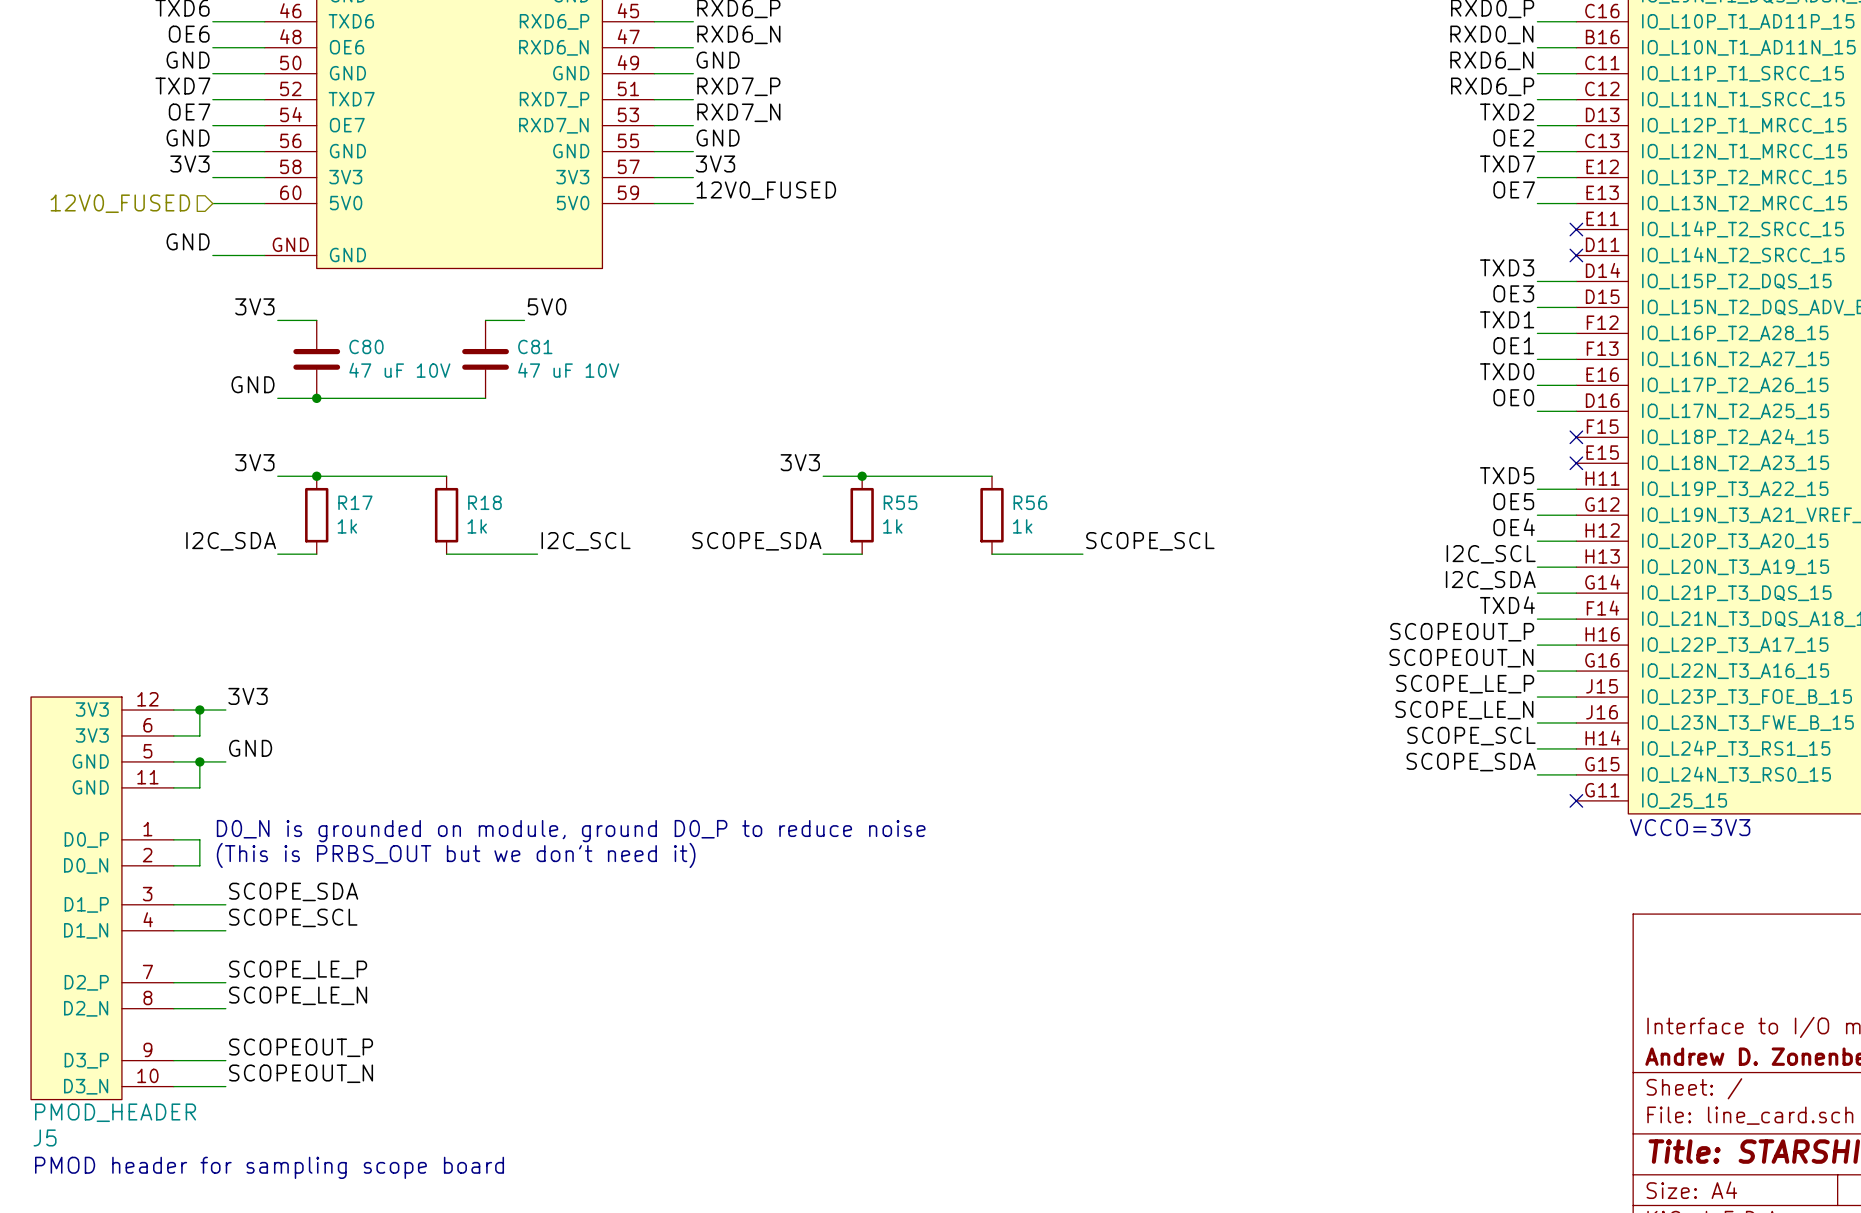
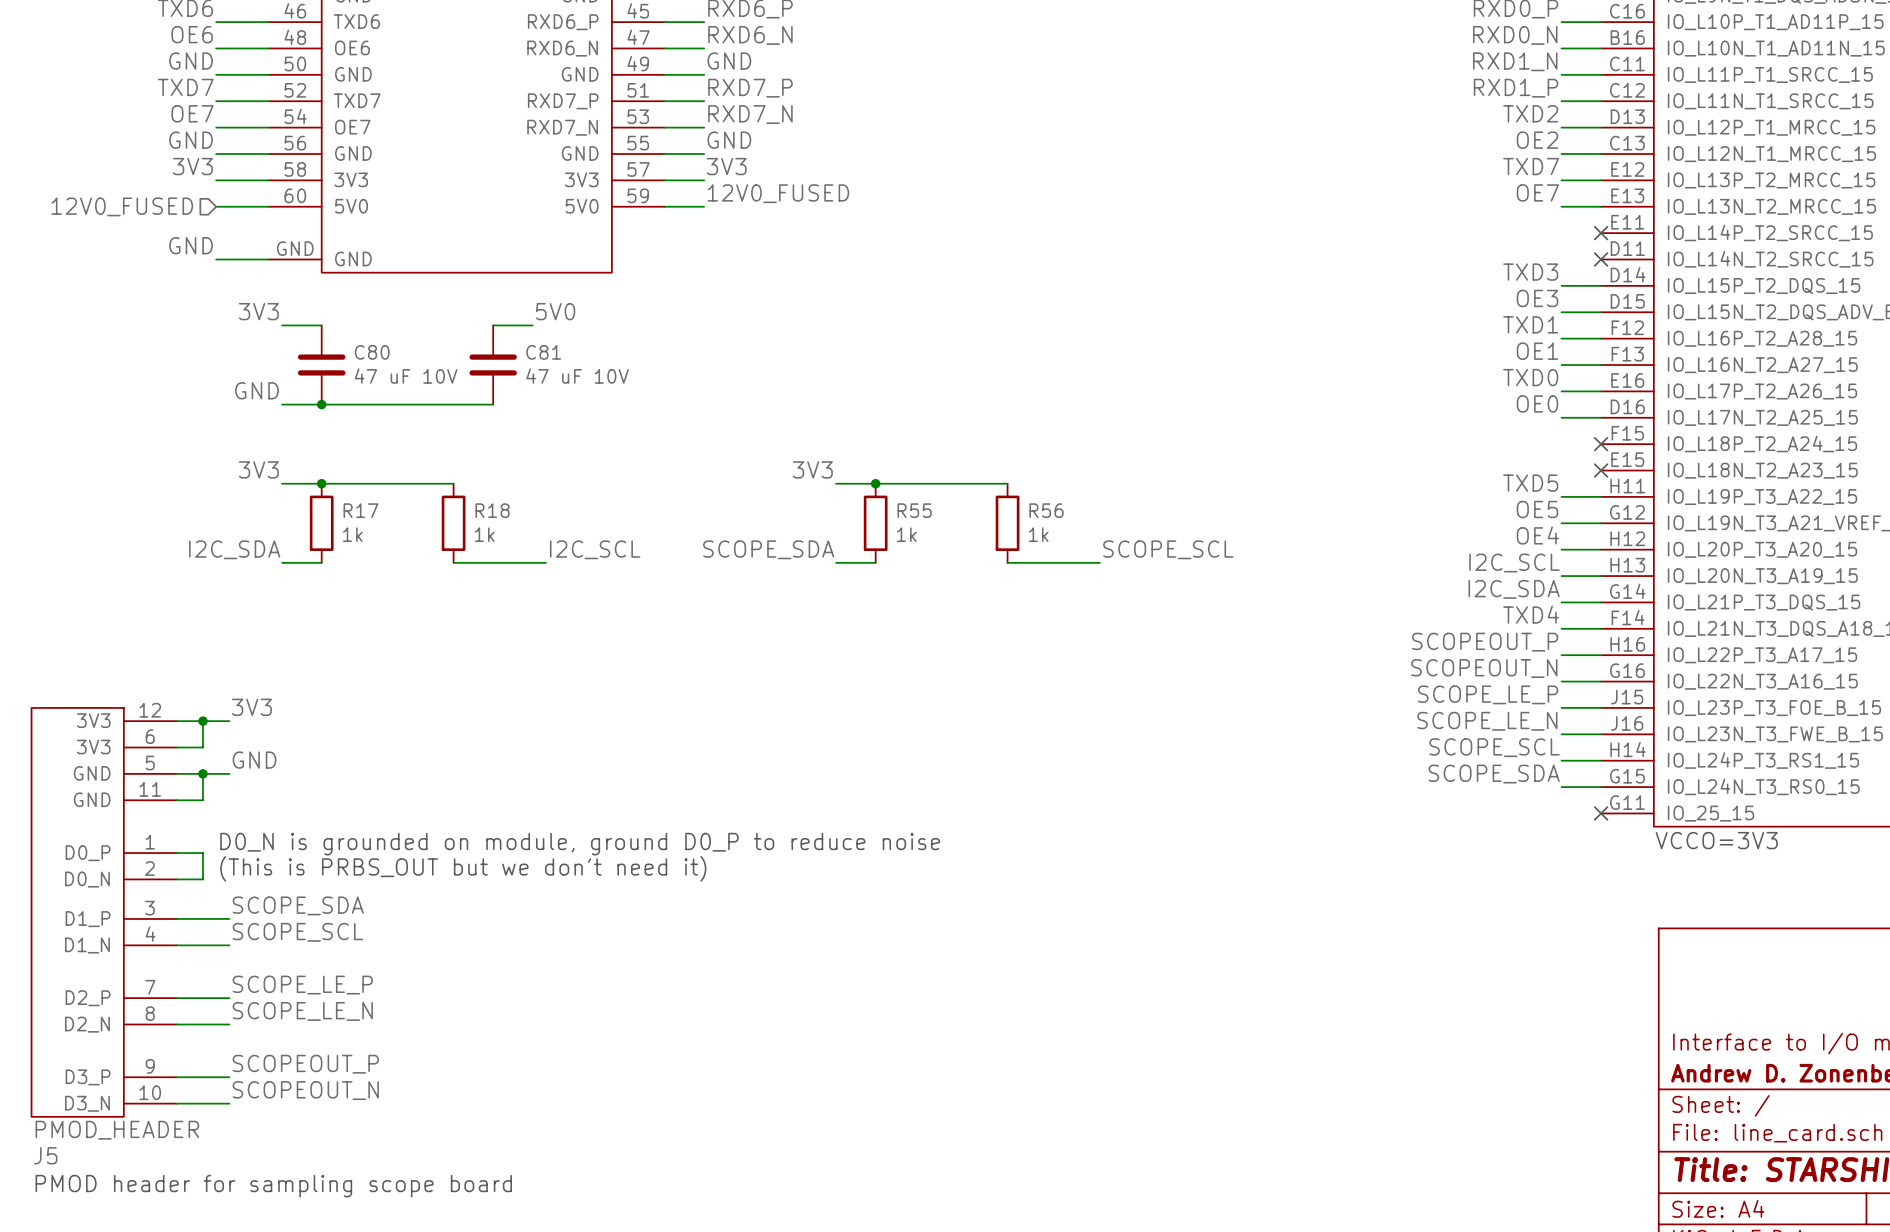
label: RXD6_N (1491, 60) -> RXD1_N (1515, 61)
label: RXD6_P (1492, 86) -> RXD1_P (1516, 88)

